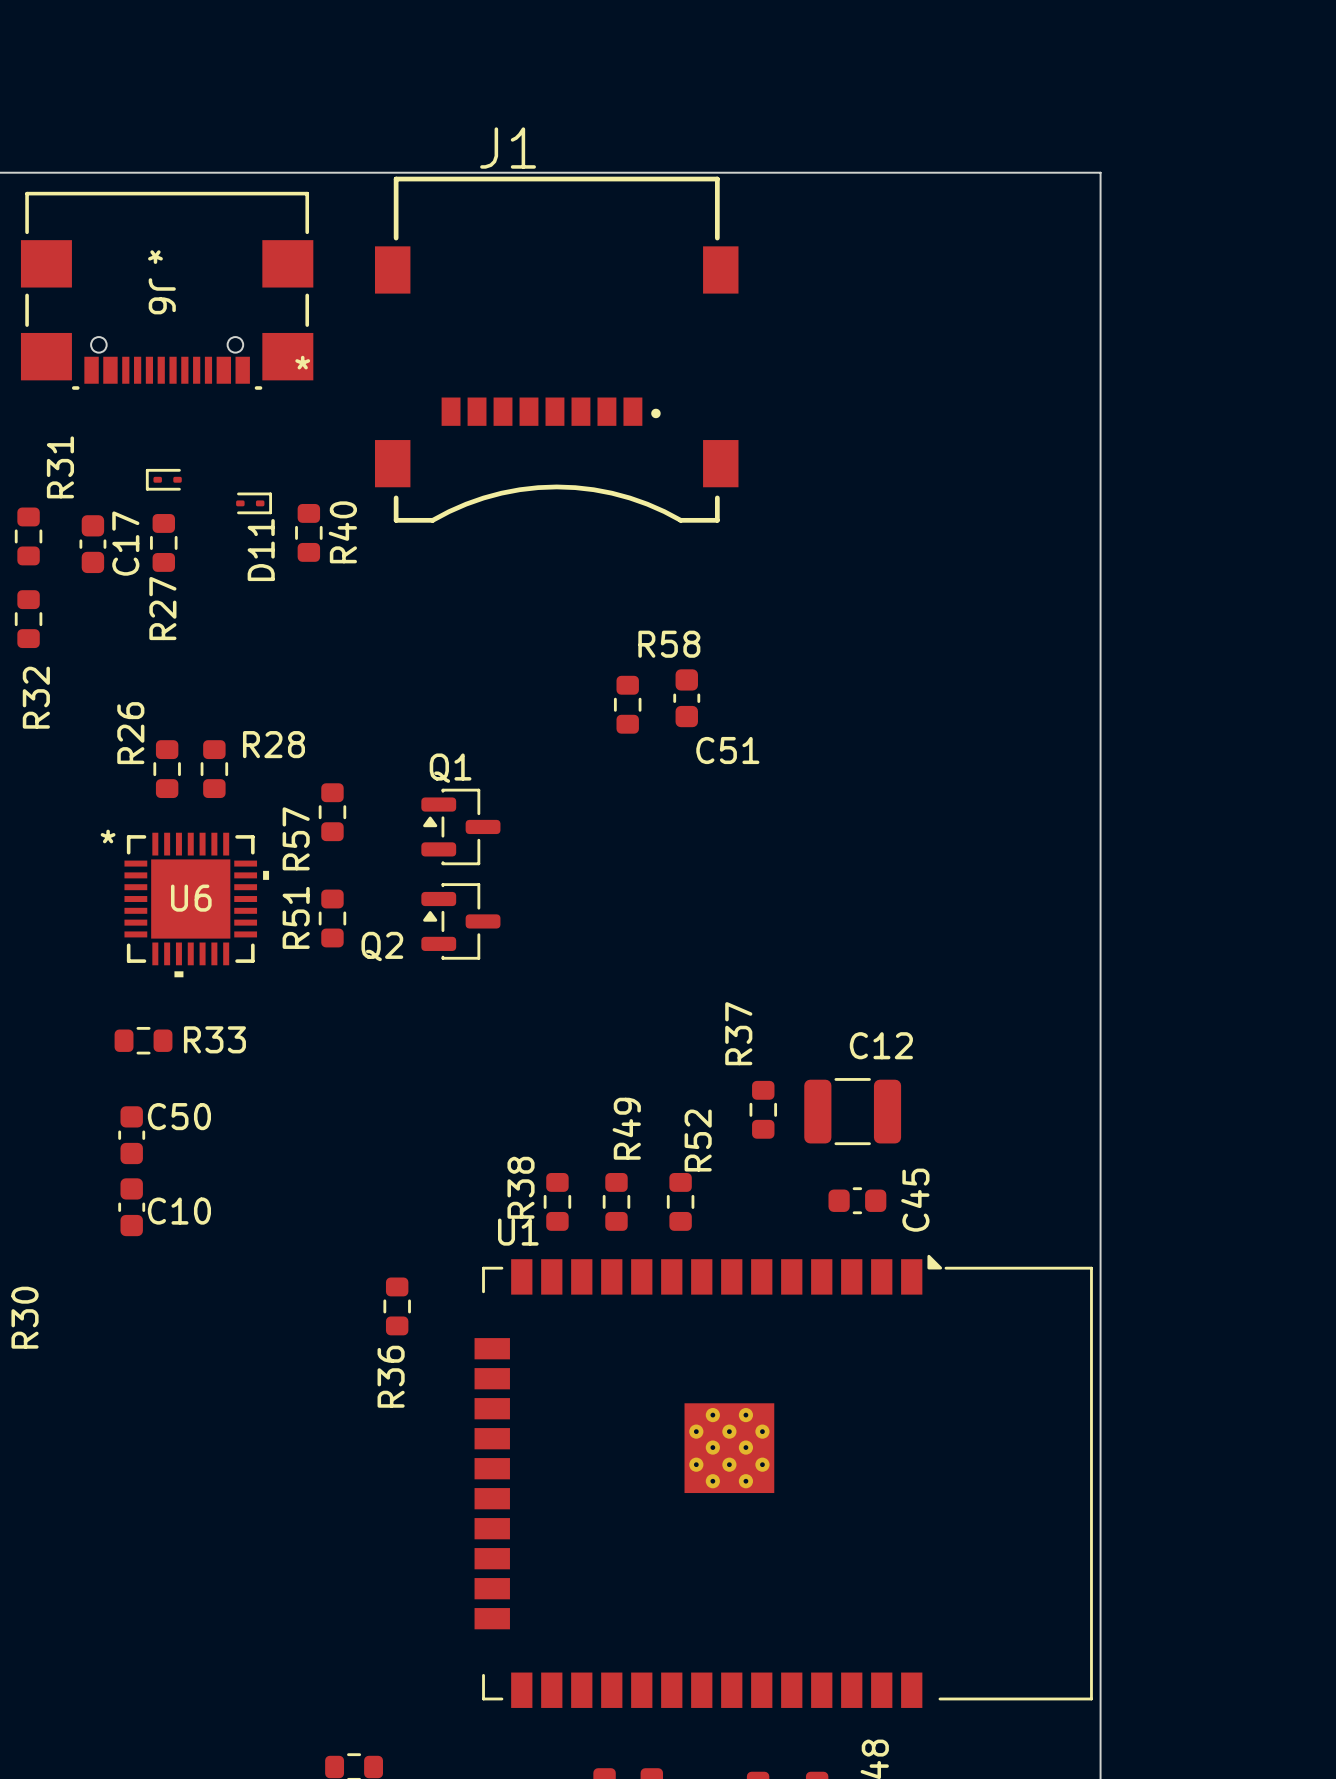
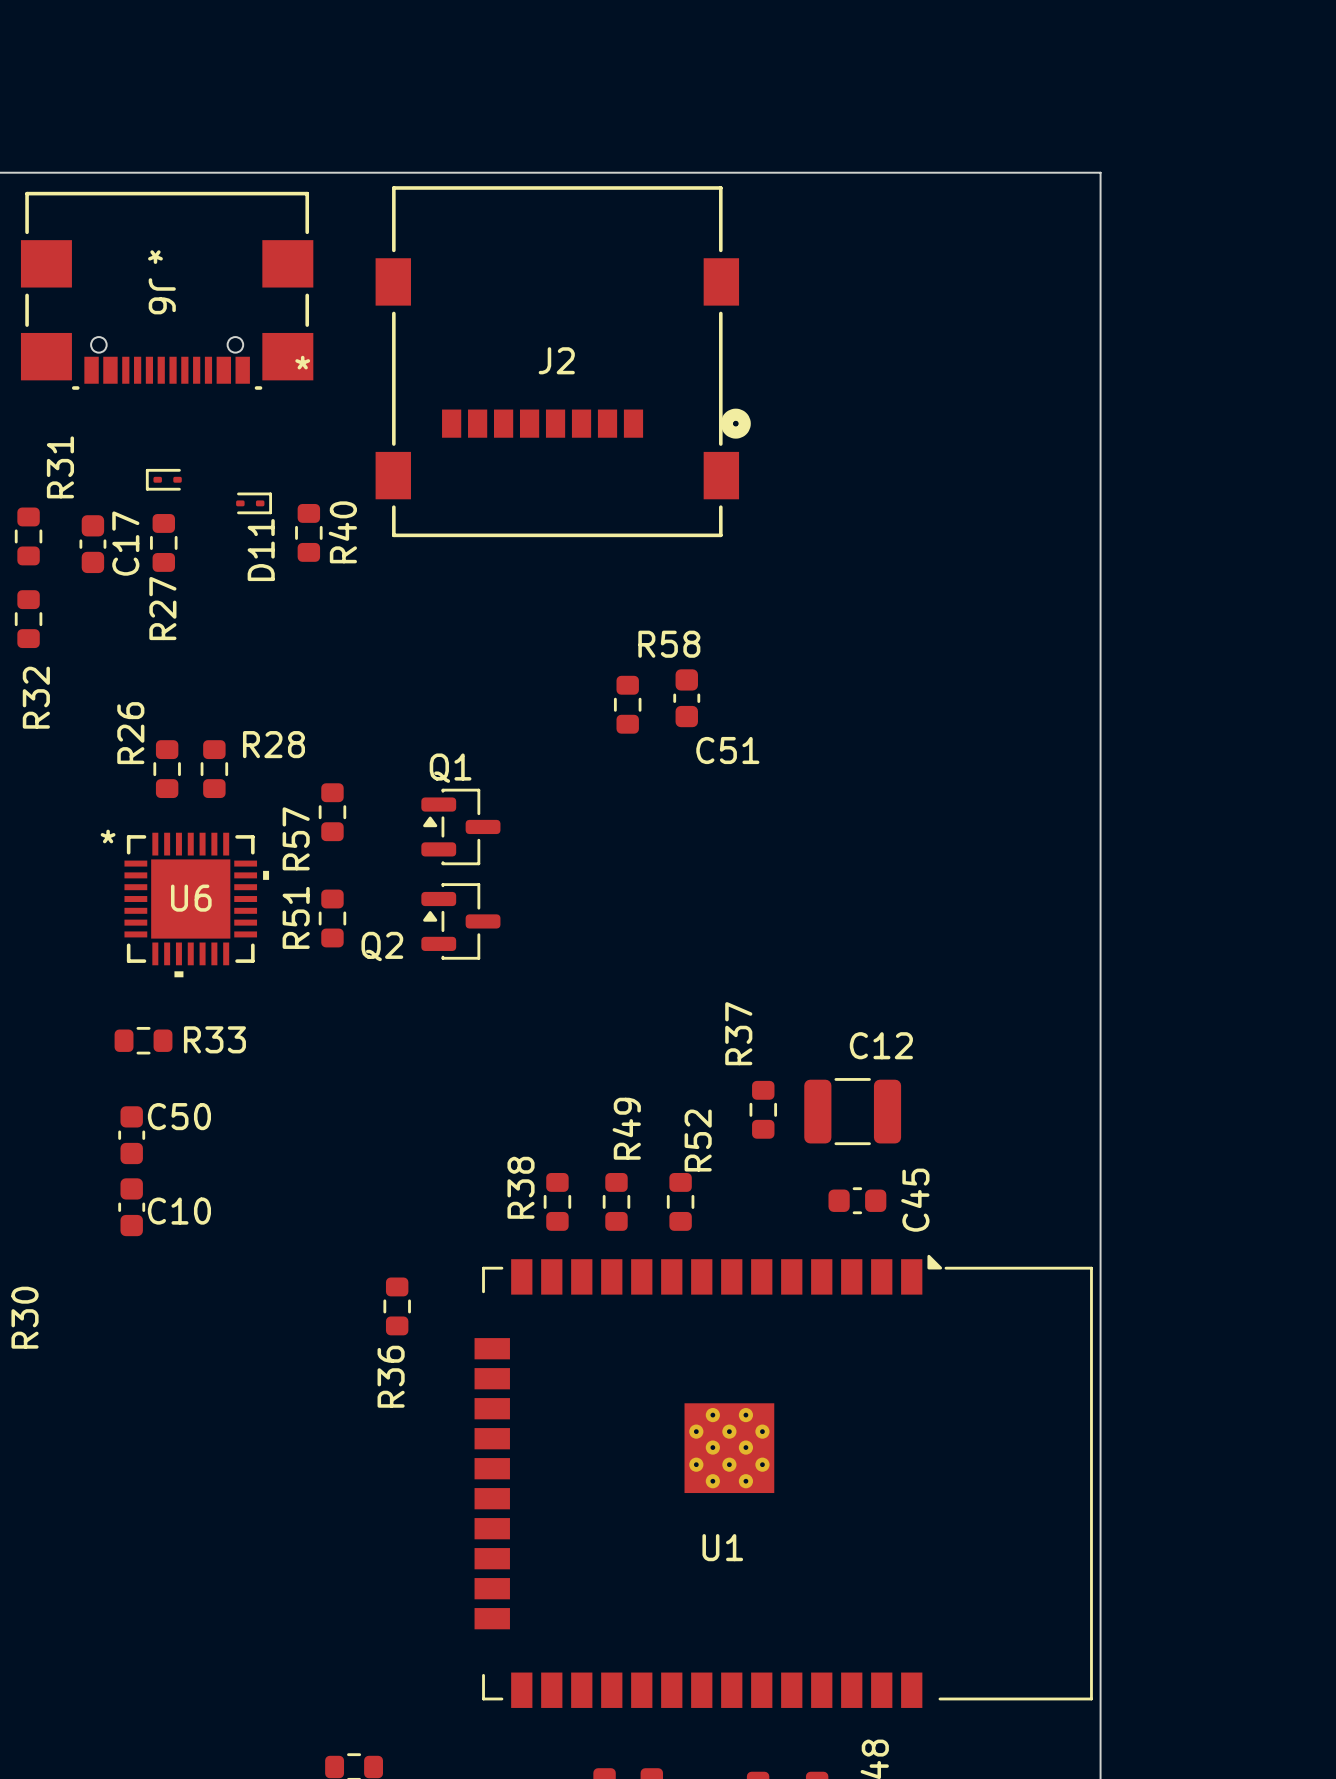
J1: (556, 349) -> none
J2: none -> (563, 361)
U1 name position: U1 (518, 1232) -> U1 (722, 1547)

